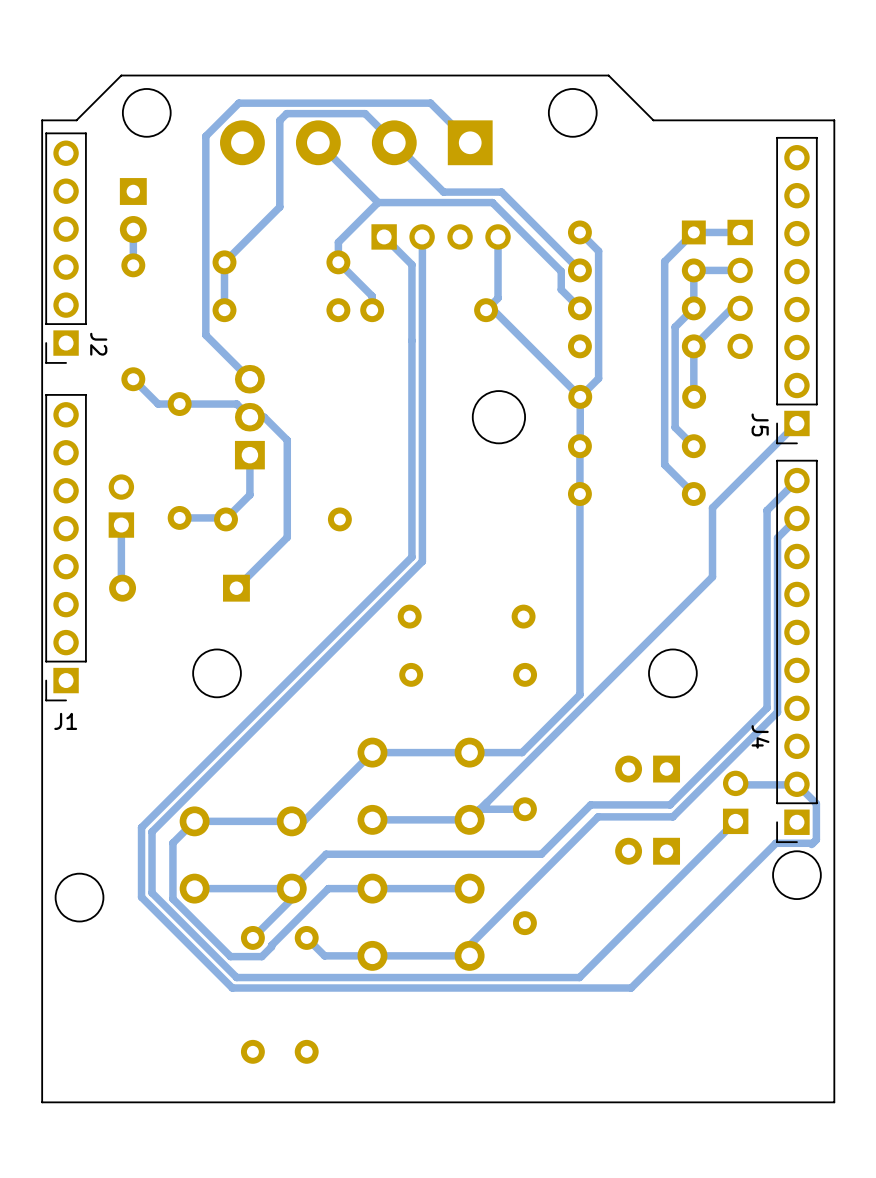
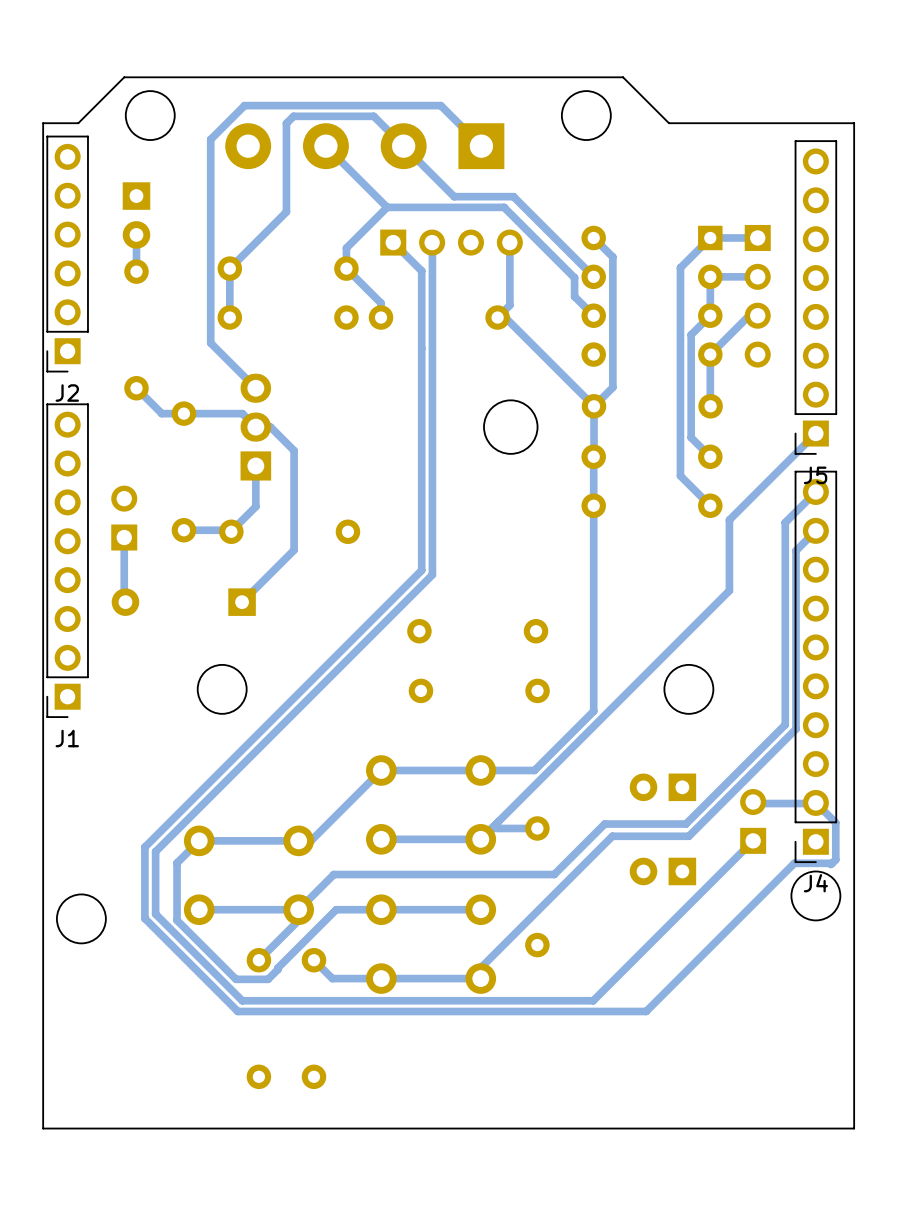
J2 name rotation: 0° (98, 344) -> 90° counterclockwise (67, 393)
J2 name position: J2 (98, 344) -> J2 (67, 393)
J5 name rotation: 0° (760, 424) -> 90° counterclockwise (815, 475)
J5 name position: J5 (760, 424) -> J5 (815, 475)
J4 name rotation: 0° (760, 736) -> 90° counterclockwise (815, 883)
J4 name position: J4 (760, 736) -> J4 (815, 883)

